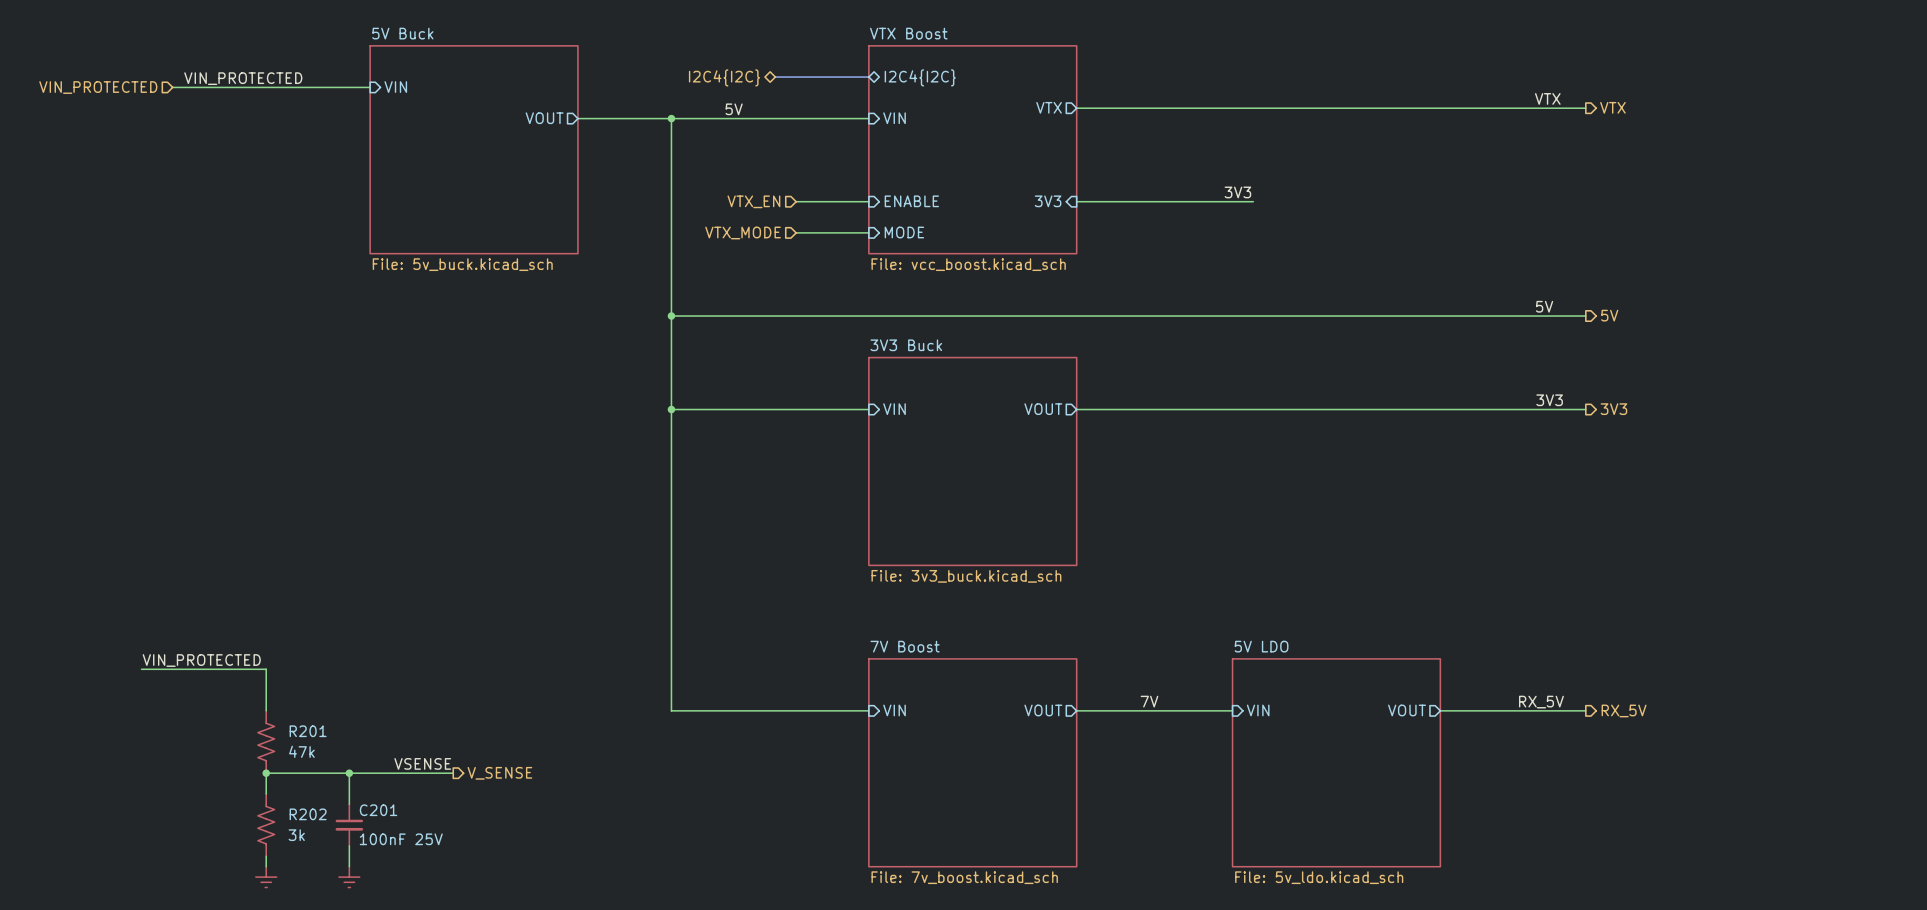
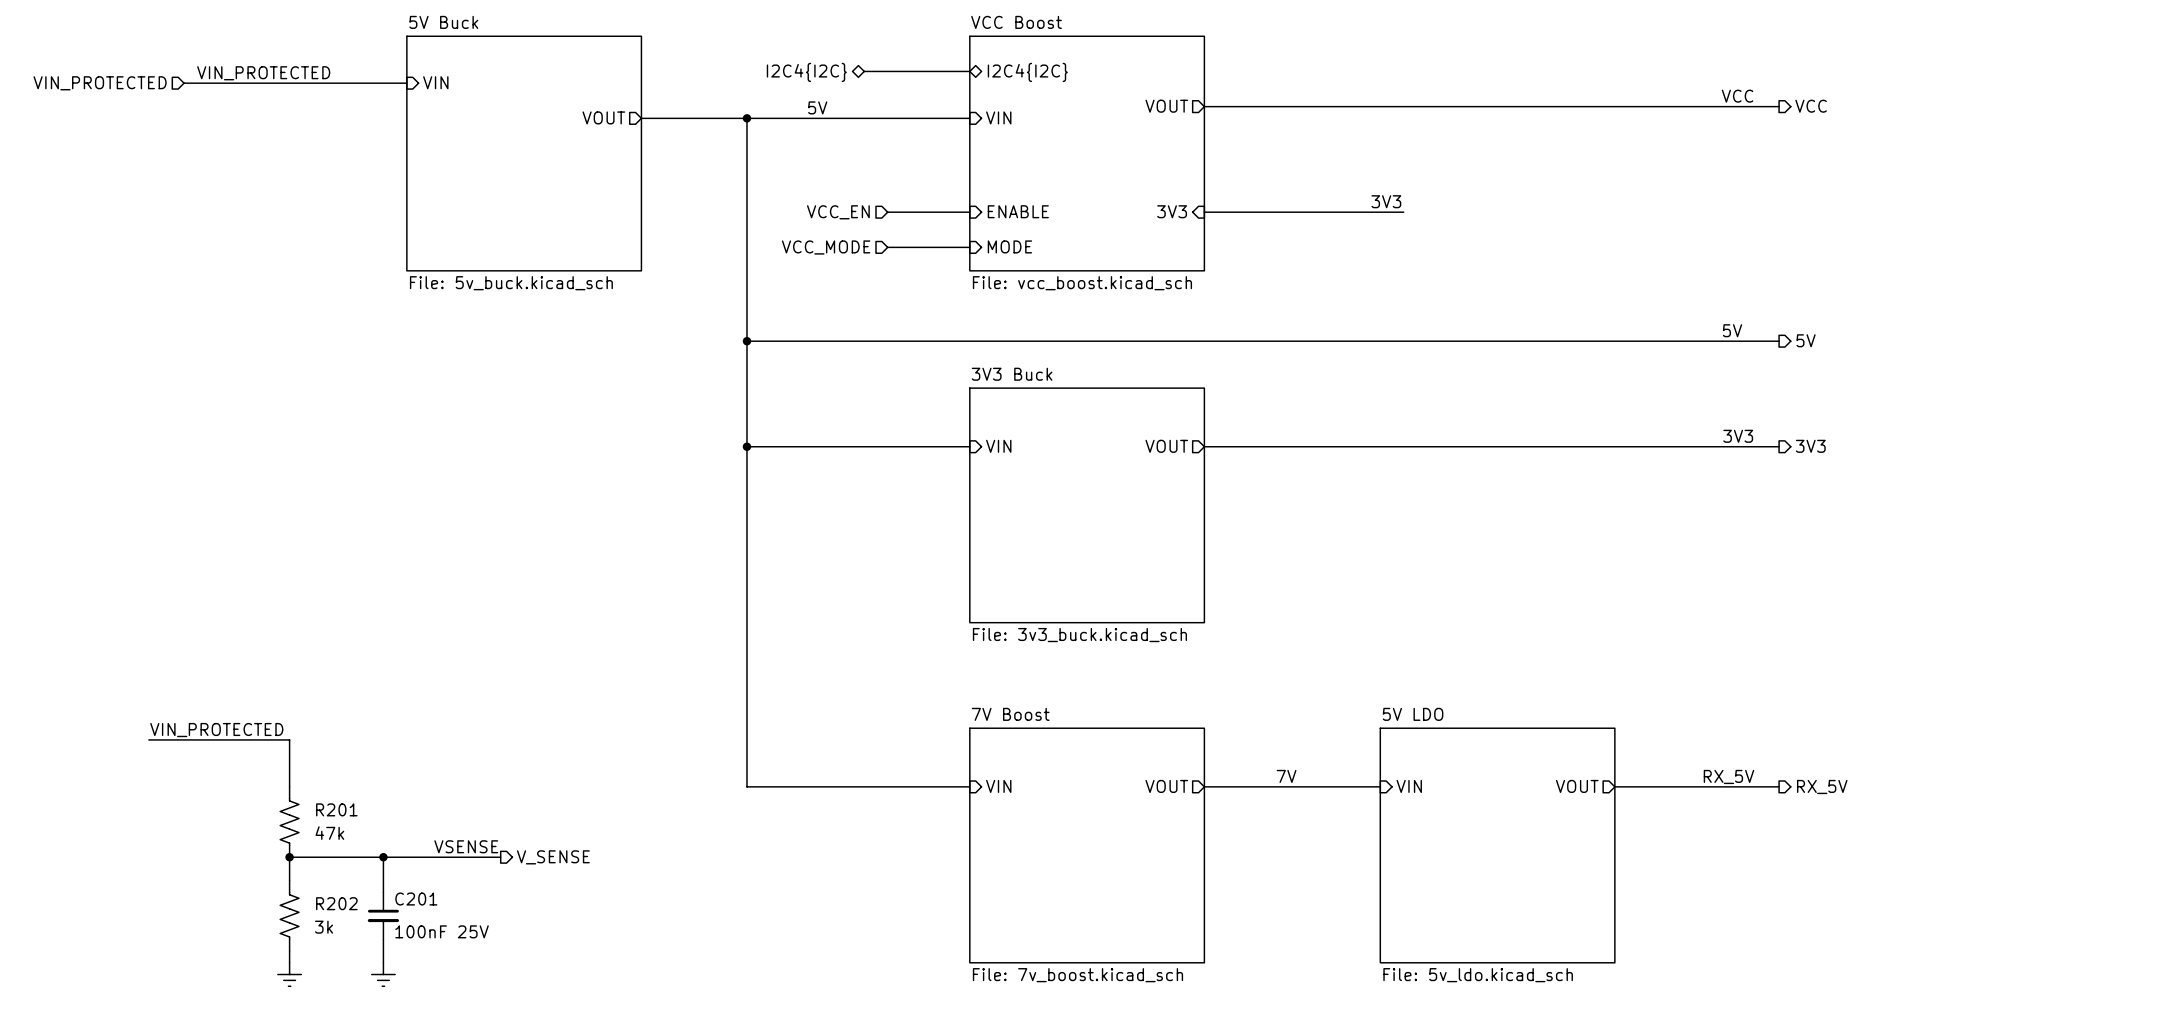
sheet VTX Boost name: VTX Boost (908, 33) -> VCC Boost (1016, 22)
label: VTX (1547, 98) -> VCC (1737, 96)
sheet pin: VTX (1049, 107) -> VOUT (1166, 106)
hierarchical label: VTX (1612, 107) -> VCC (1811, 106)
hierarchical label: VTX_EN (753, 201) -> VCC_EN (838, 212)
hierarchical label: VTX_MODE (743, 233) -> VCC_MODE (826, 247)

